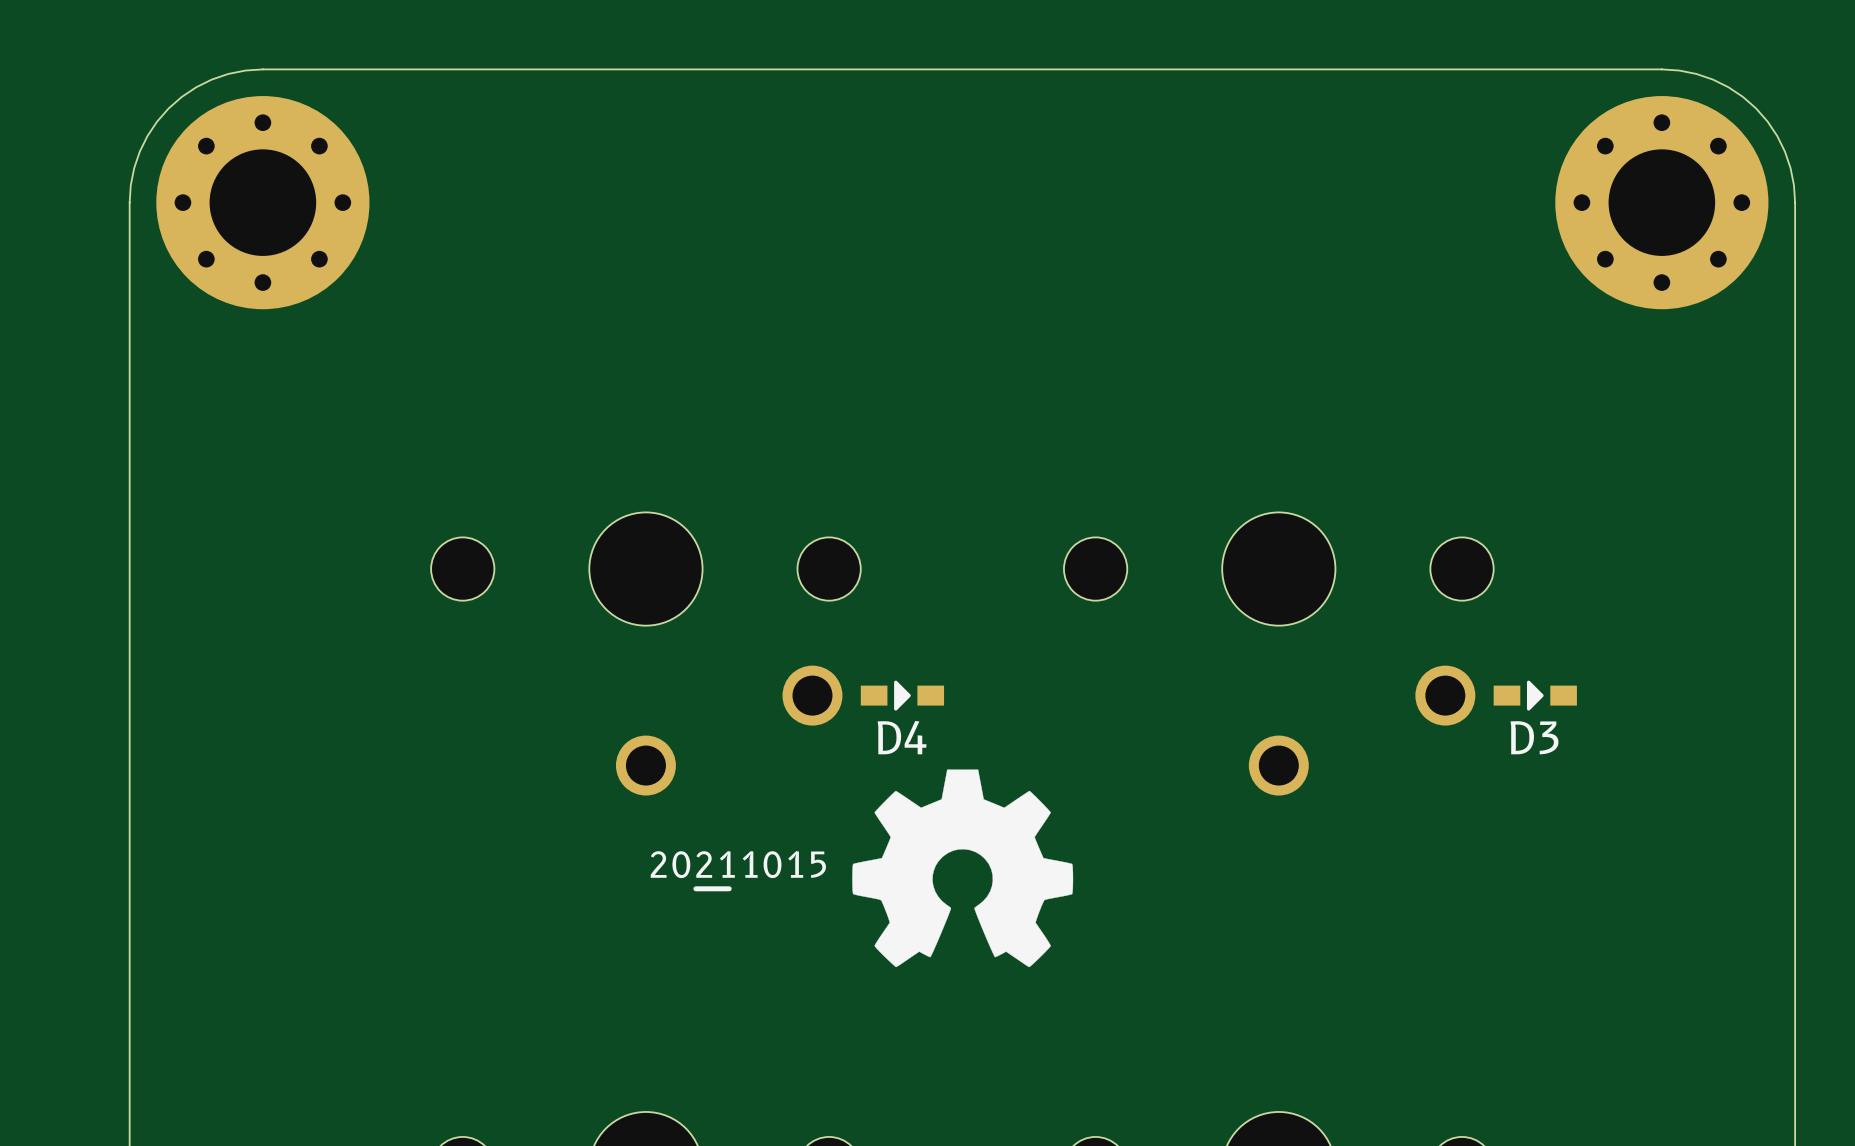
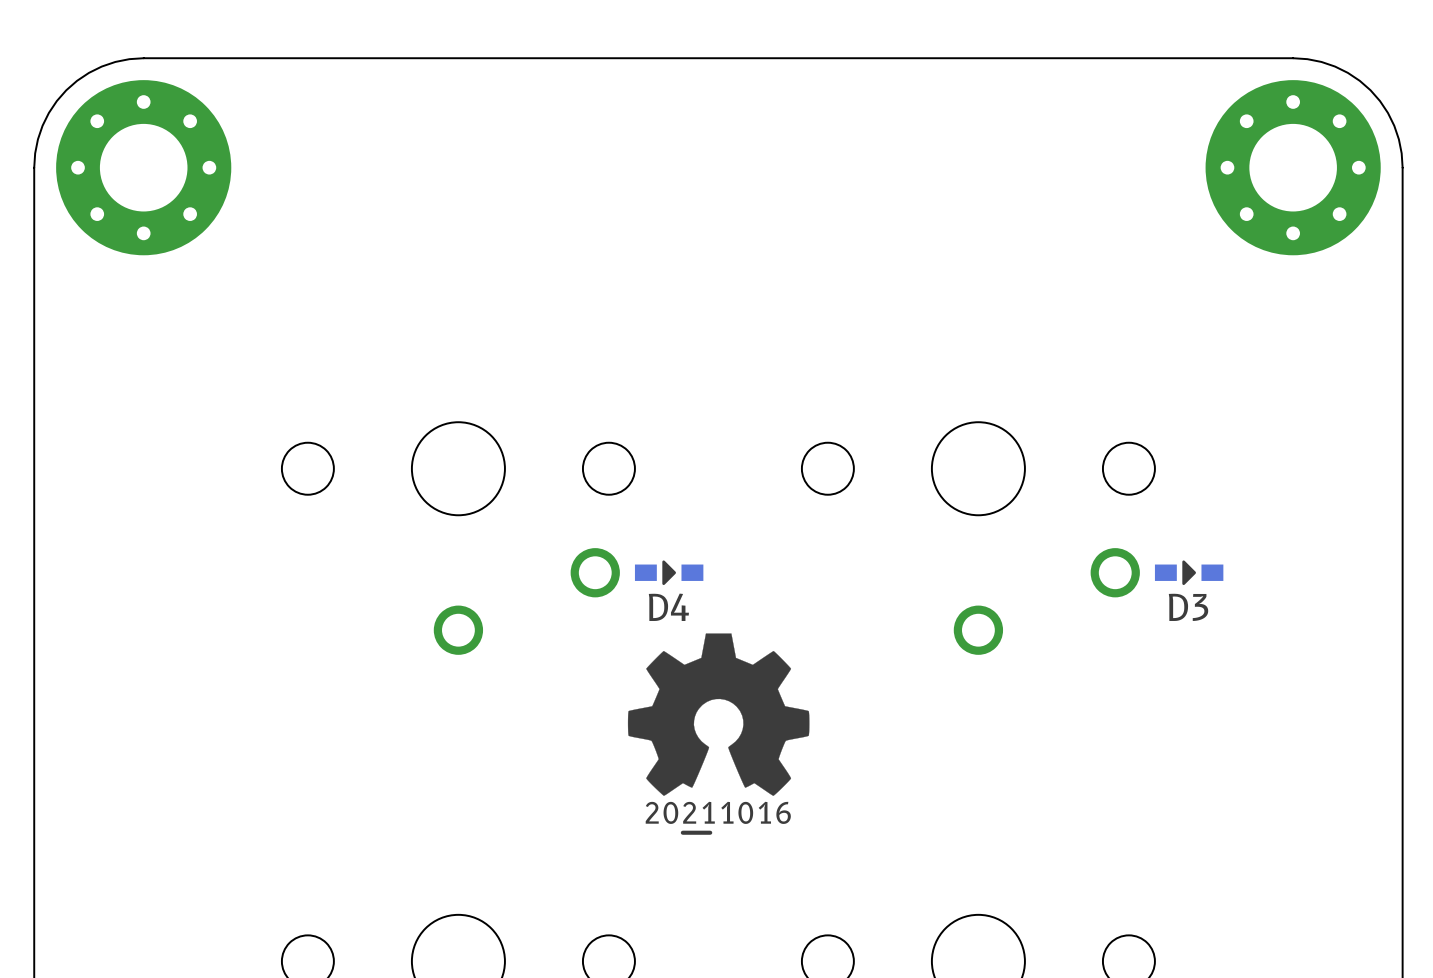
drawing: [693, 886, 732, 892] -> none
drawing: none -> [680, 830, 713, 835]

